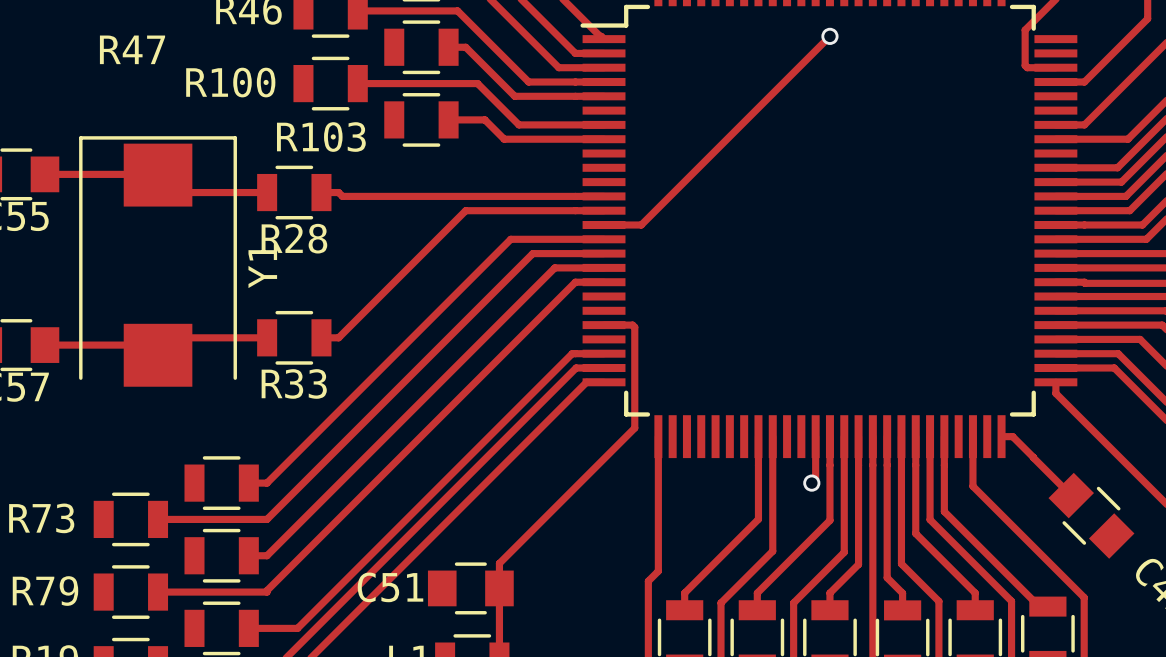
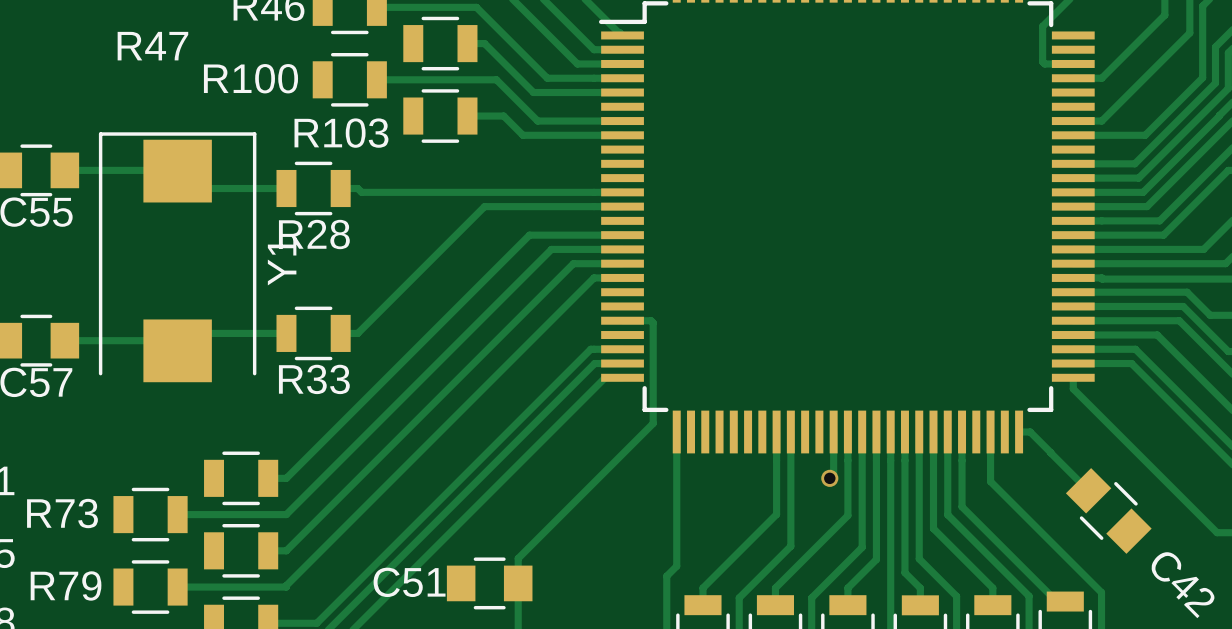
track: (829, 36) (641, 225) (604, 225) -> none
via: (829, 36) -> none

